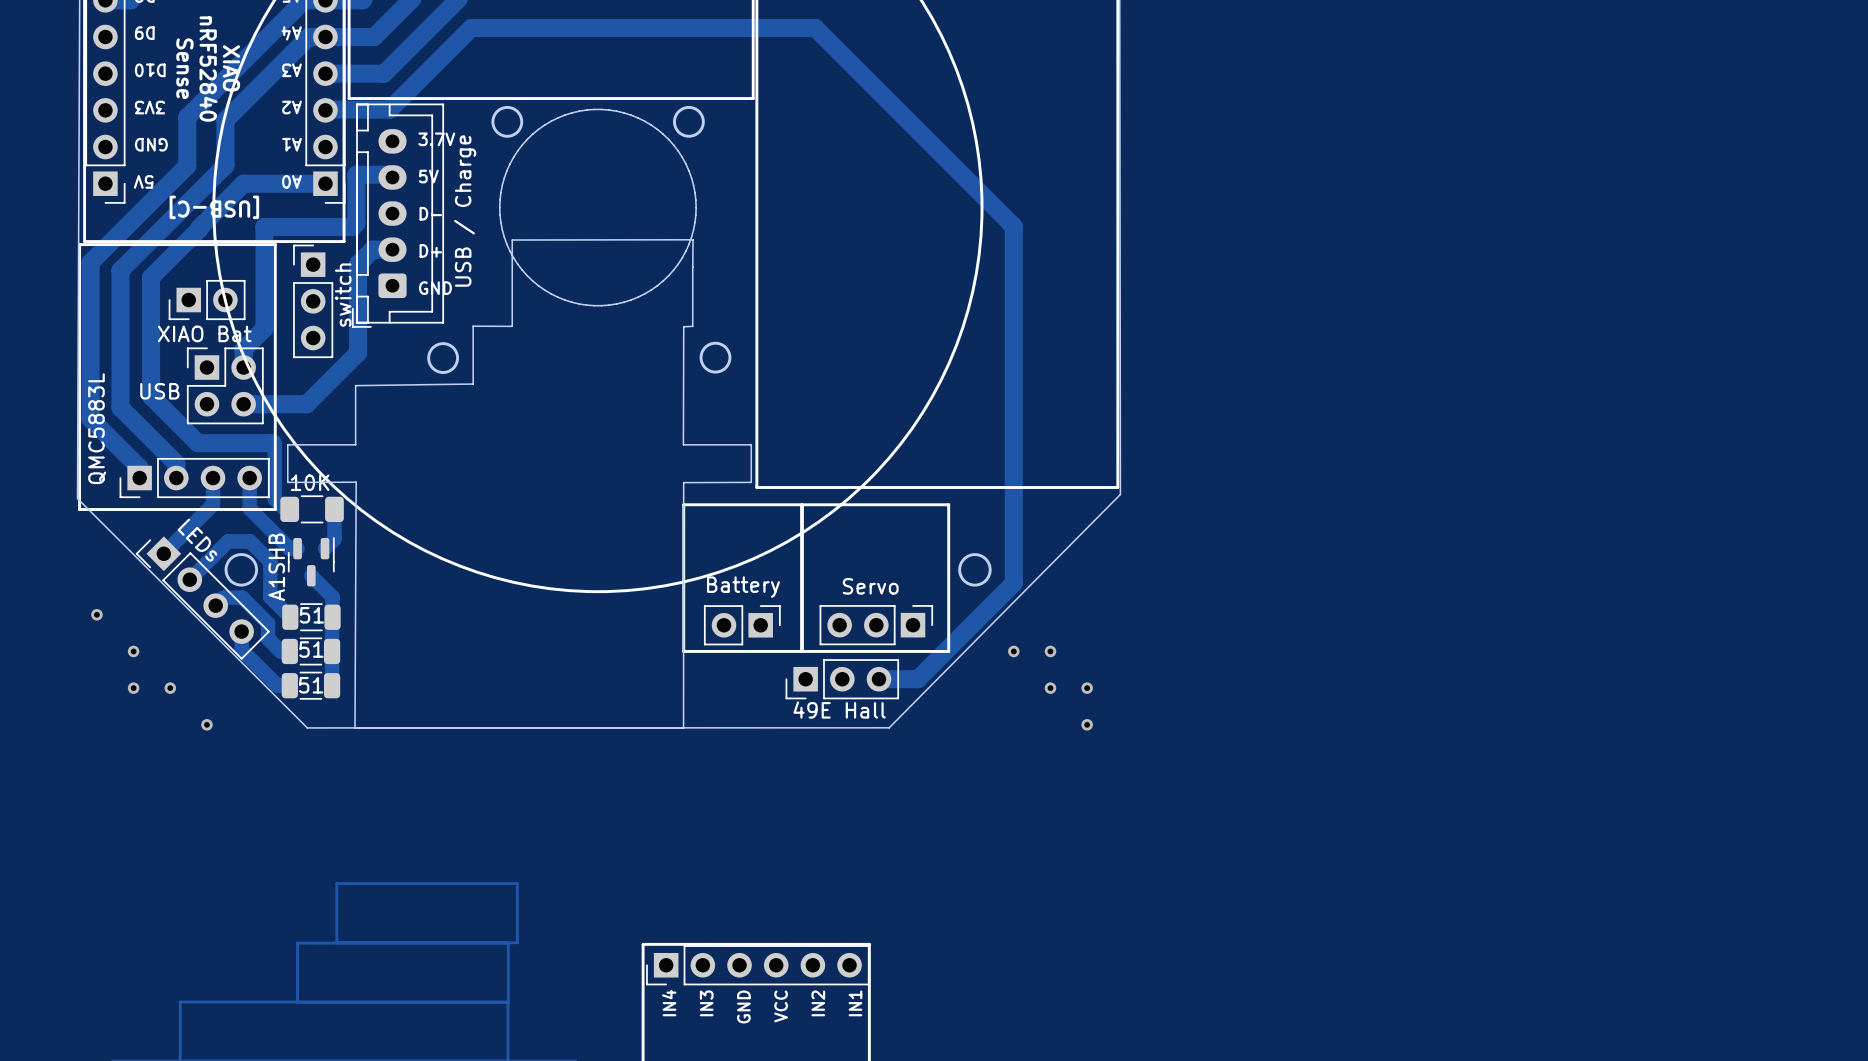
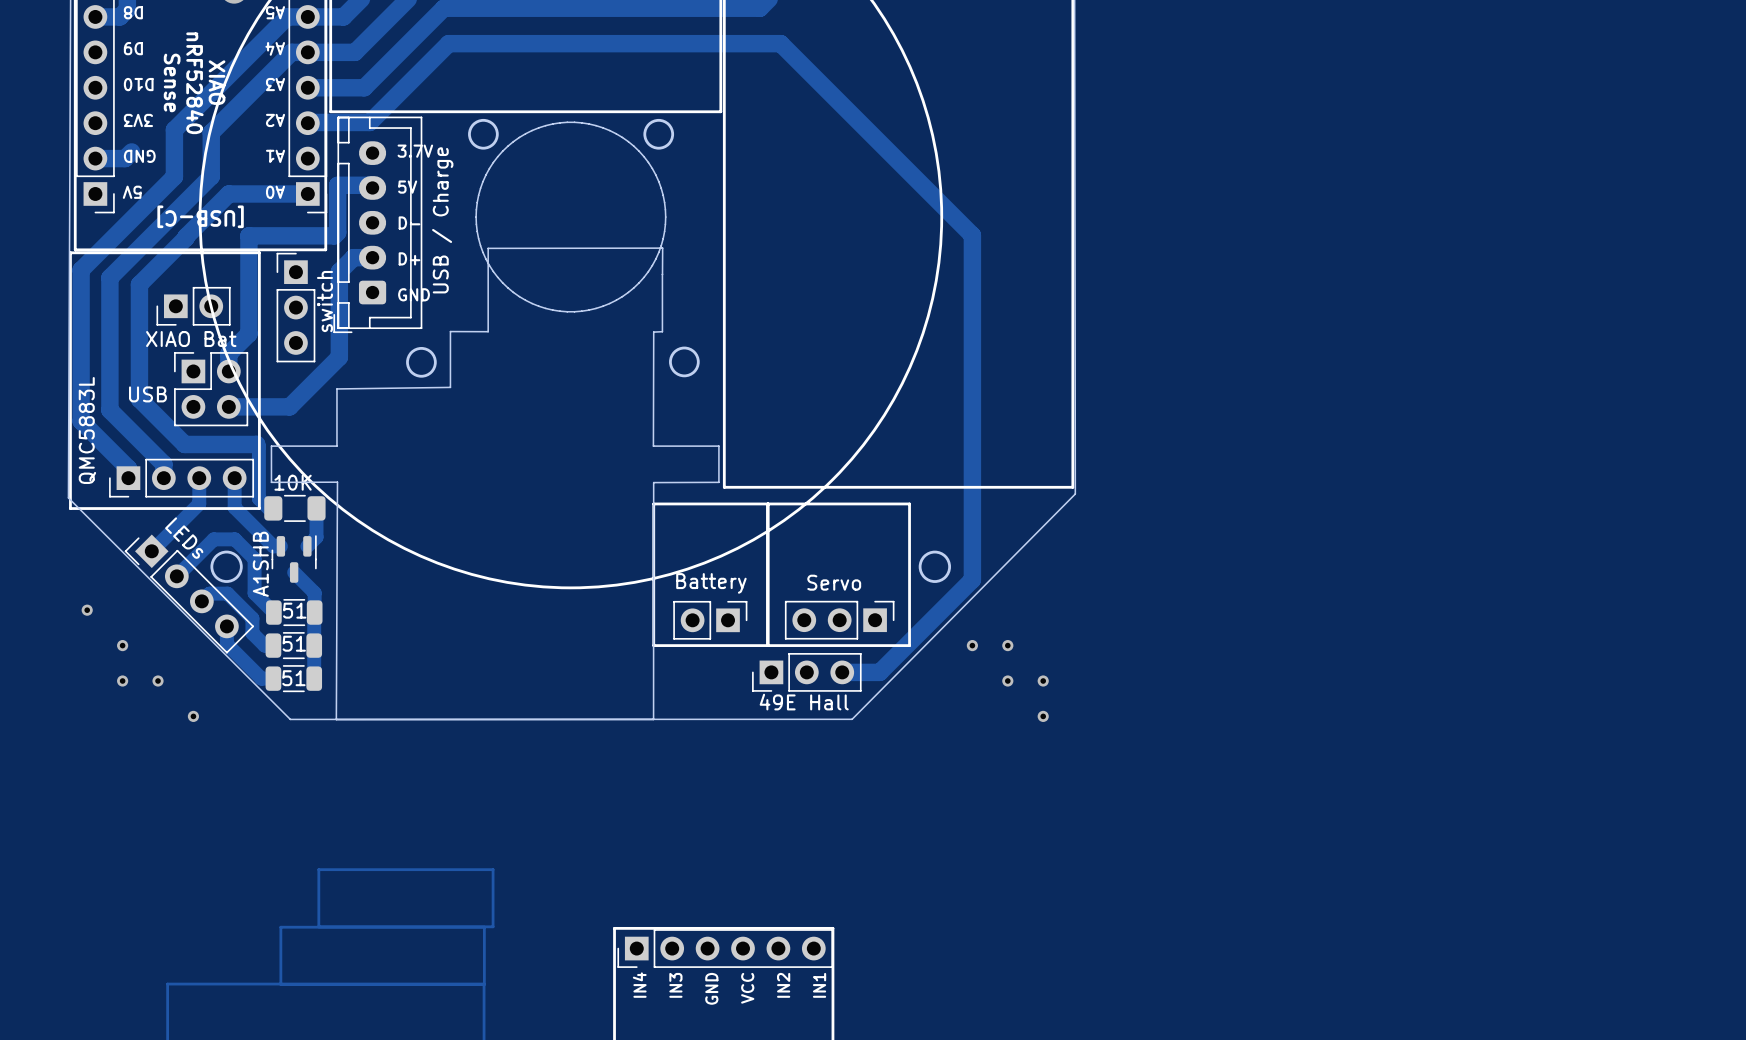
track: none -> (131, 151) (125, 158) (95, 158)

